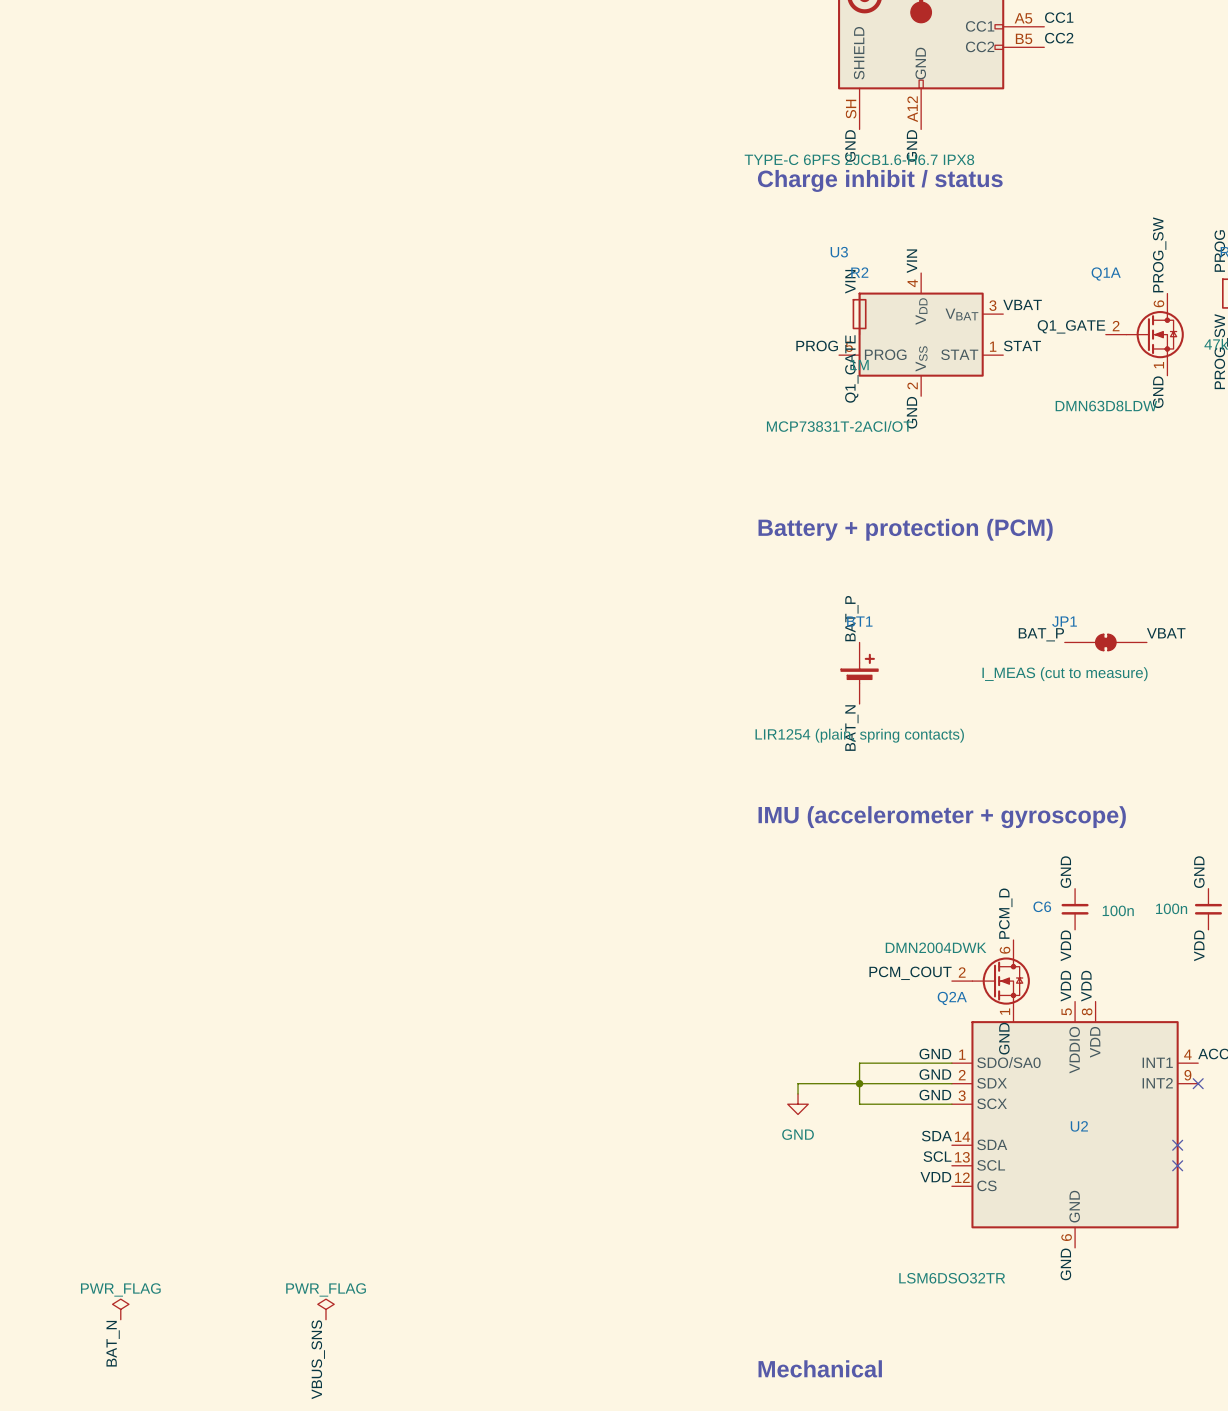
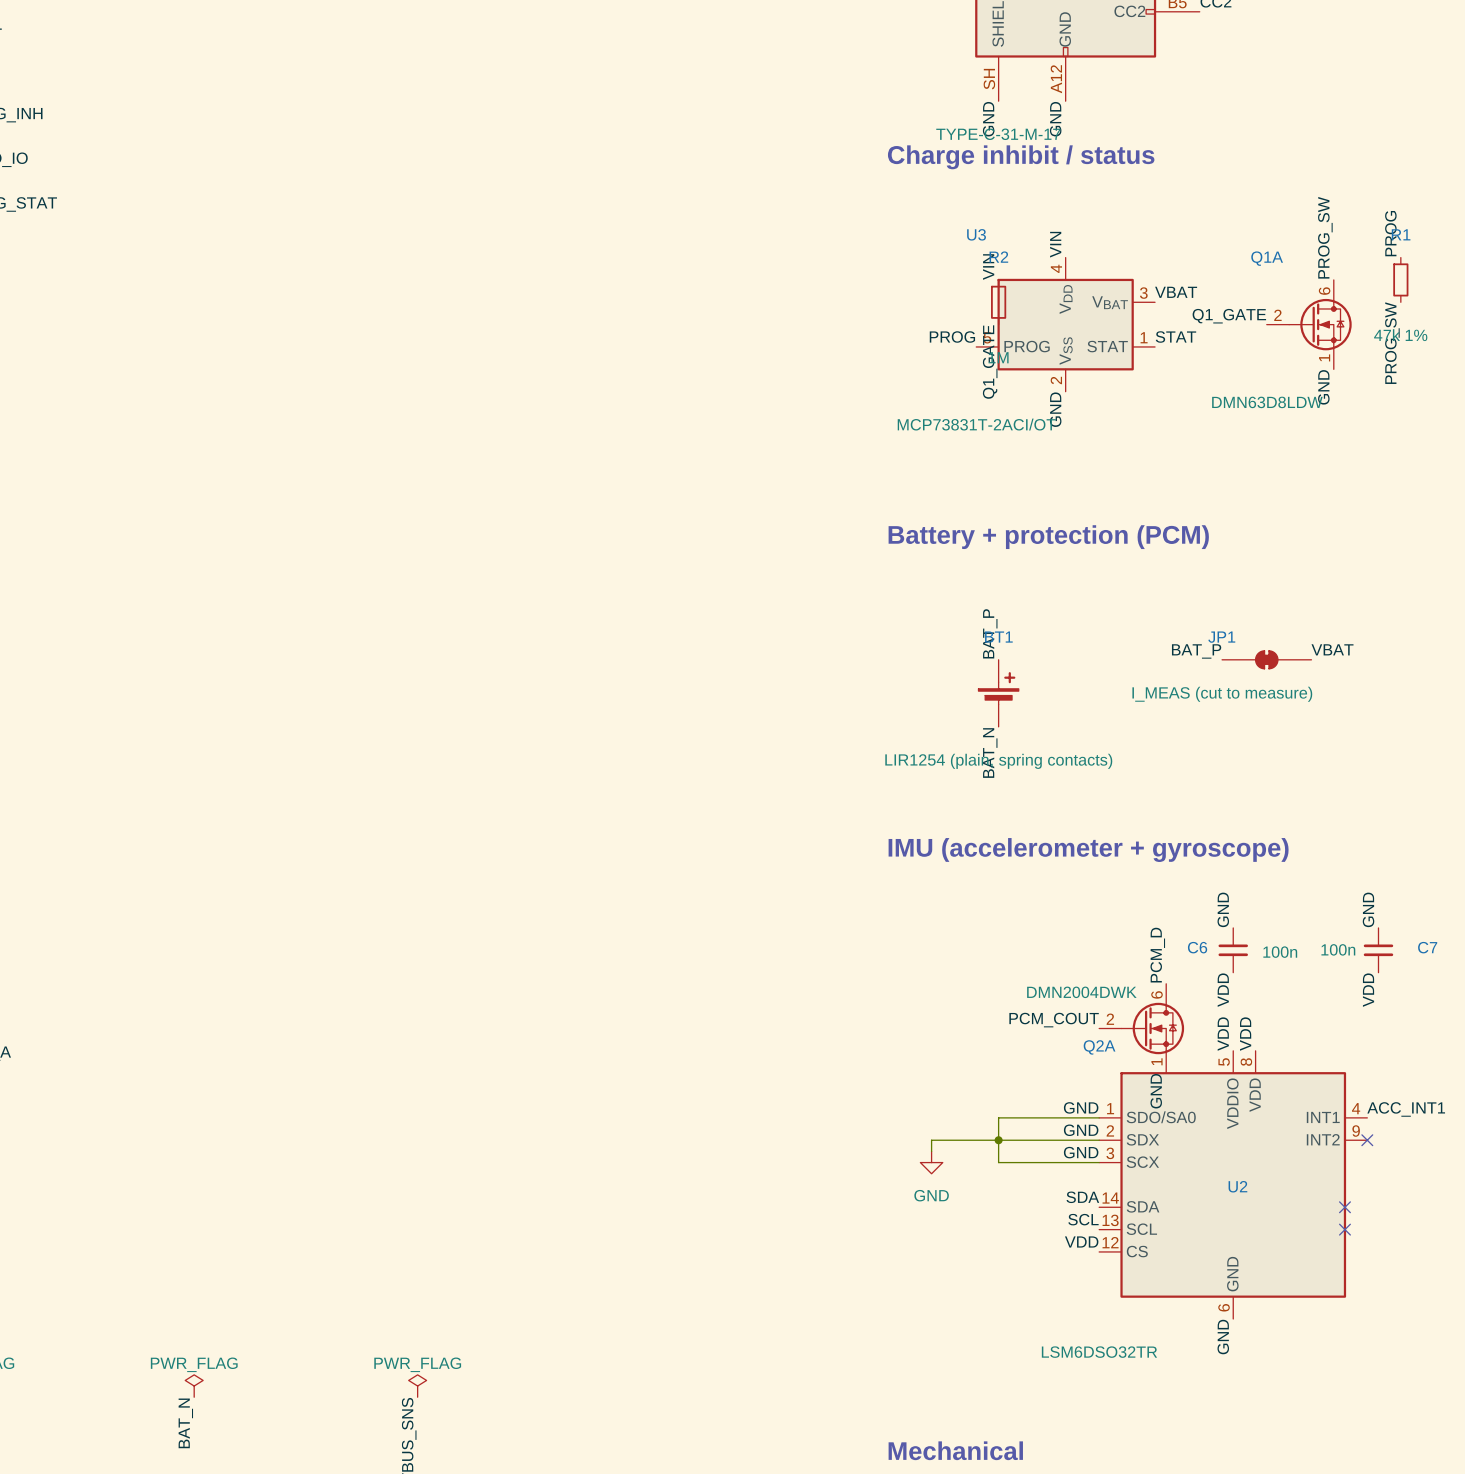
part value: TYPE-C 6PFS 2JCB1.6-H6.7 IPX8 (859, 159) -> TYPE-C-31-M-17 (998, 134)

